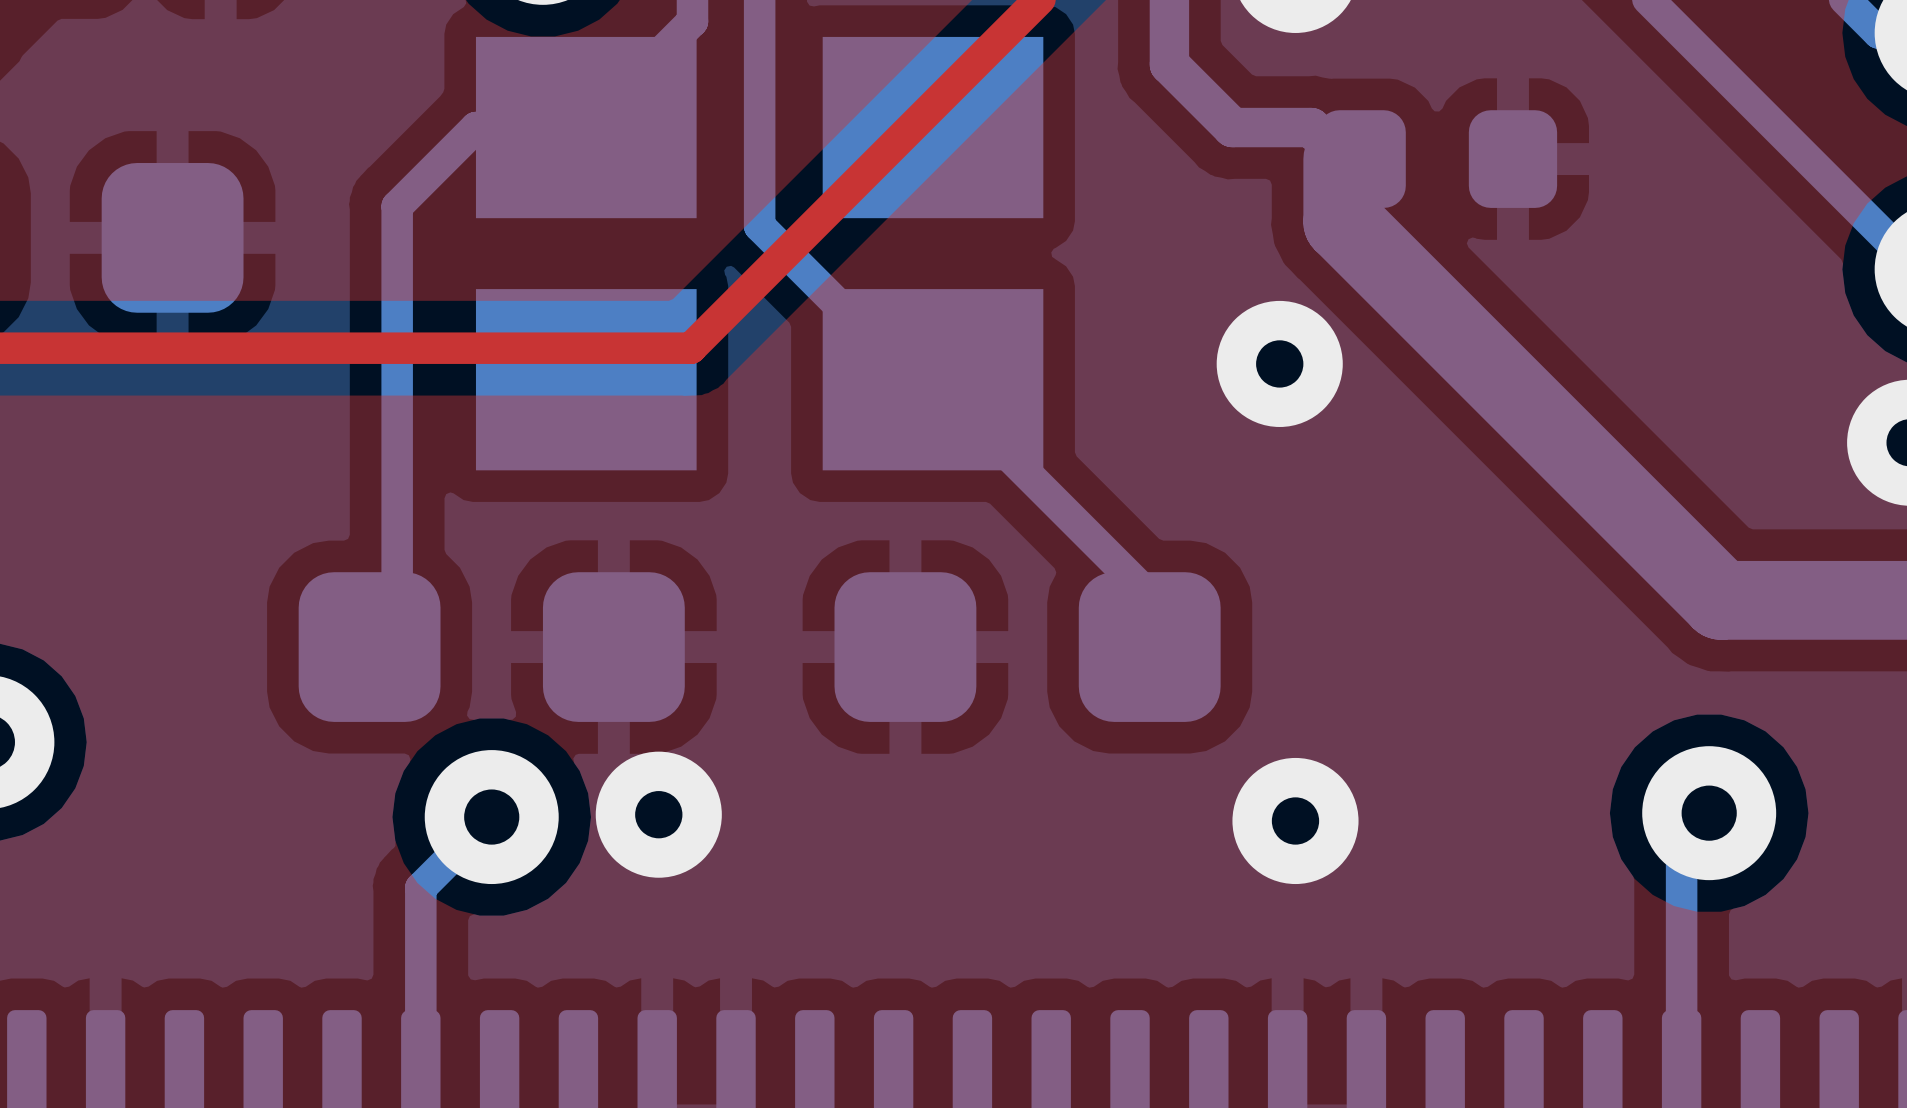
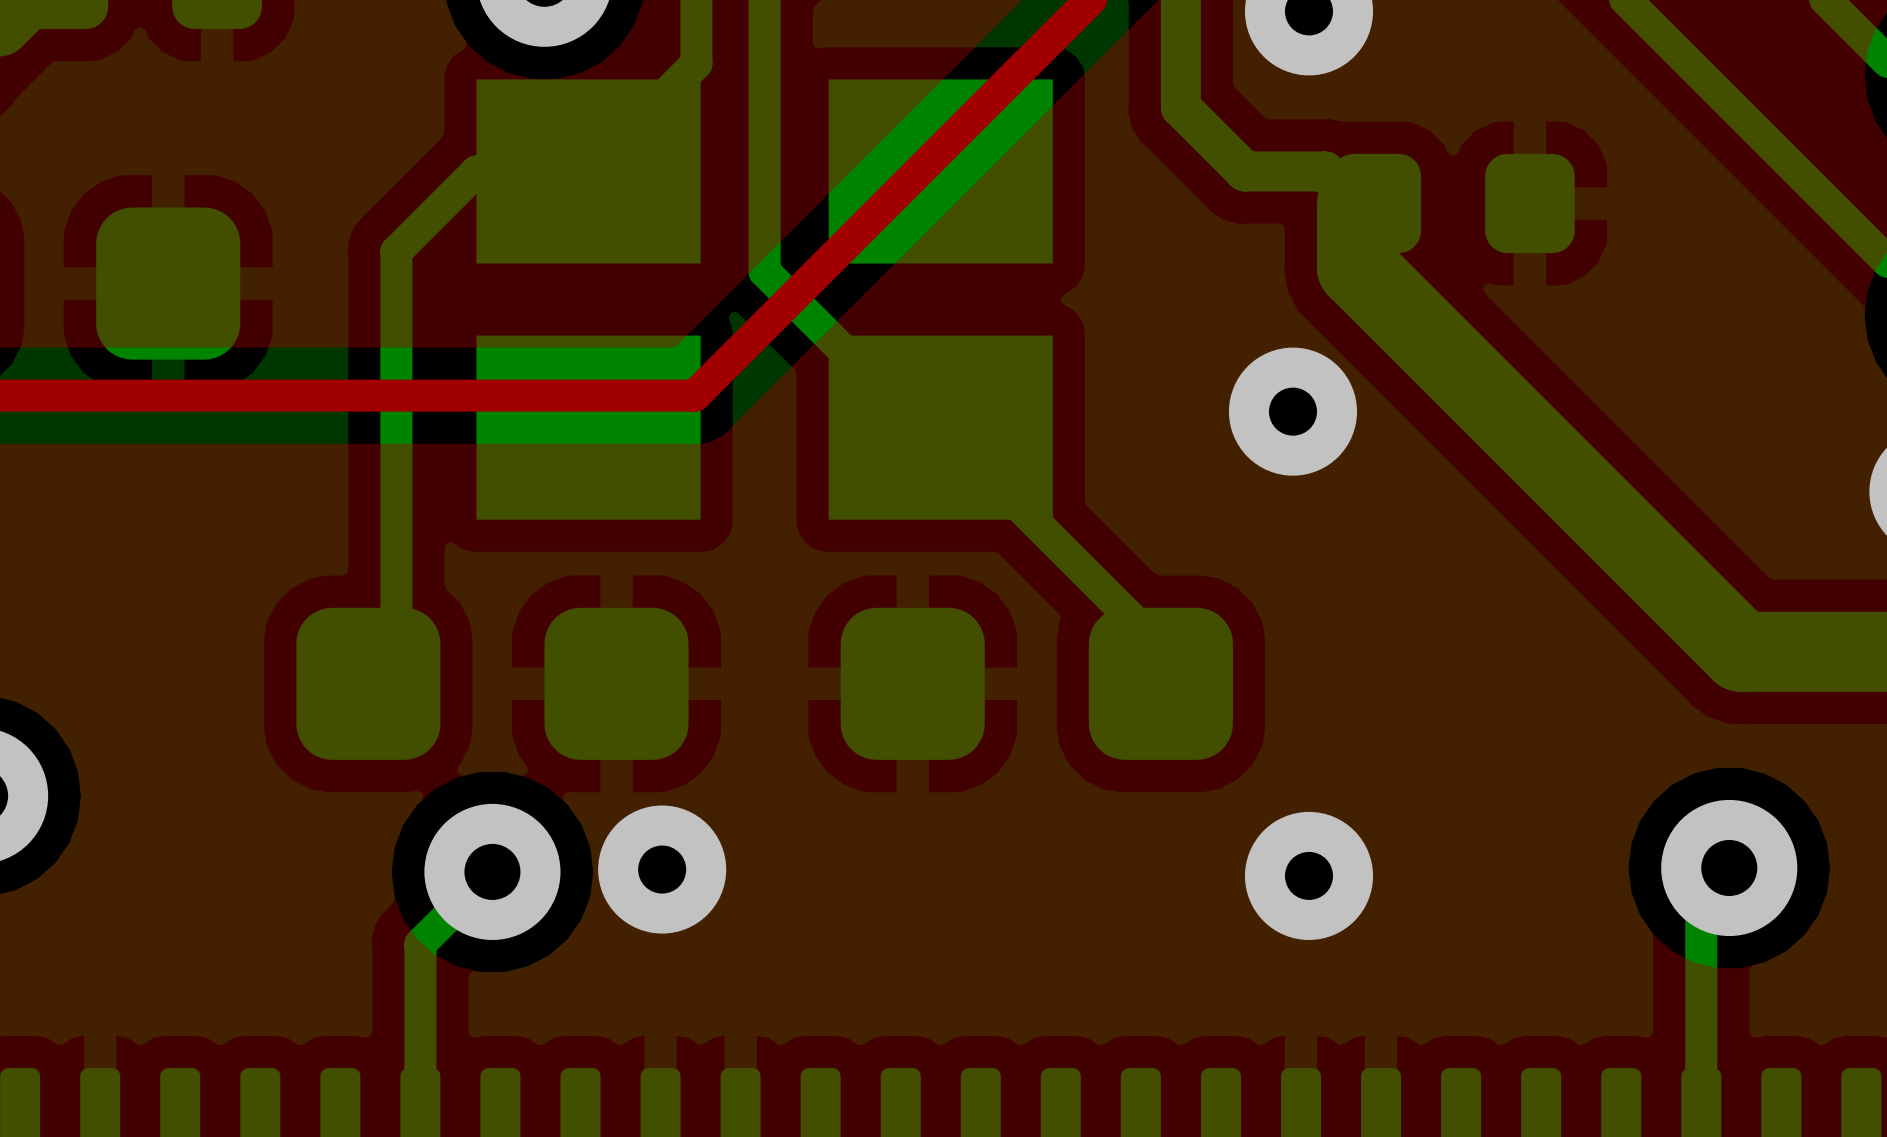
part position: (491, 647) -> (492, 683)
part position: (1027, 647) -> (1036, 683)

